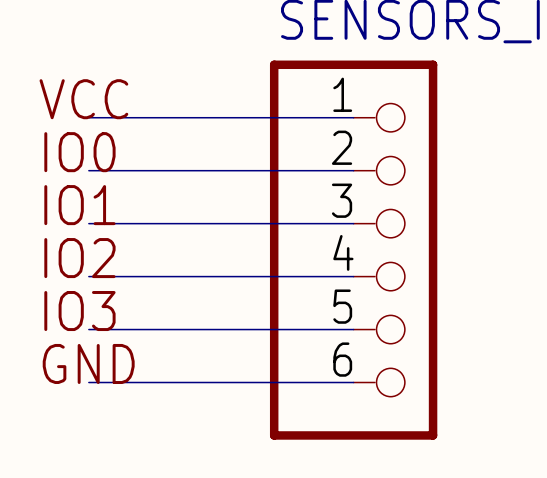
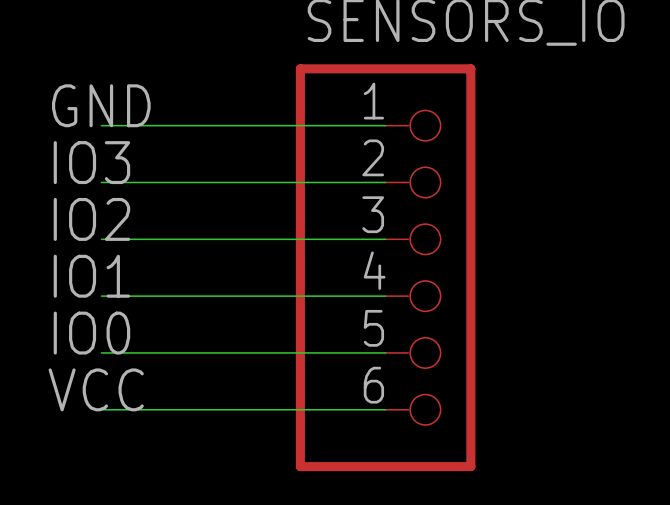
label: VCC (83, 99) -> GND (101, 105)
label: IO0 (79, 152) -> IO3 (91, 162)
label: IO1 (79, 205) -> IO2 (91, 219)
label: IO2 (79, 258) -> IO1 (91, 276)
label: IO3 (79, 311) -> IO0 (91, 333)
label: GND (88, 363) -> VCC (96, 389)

